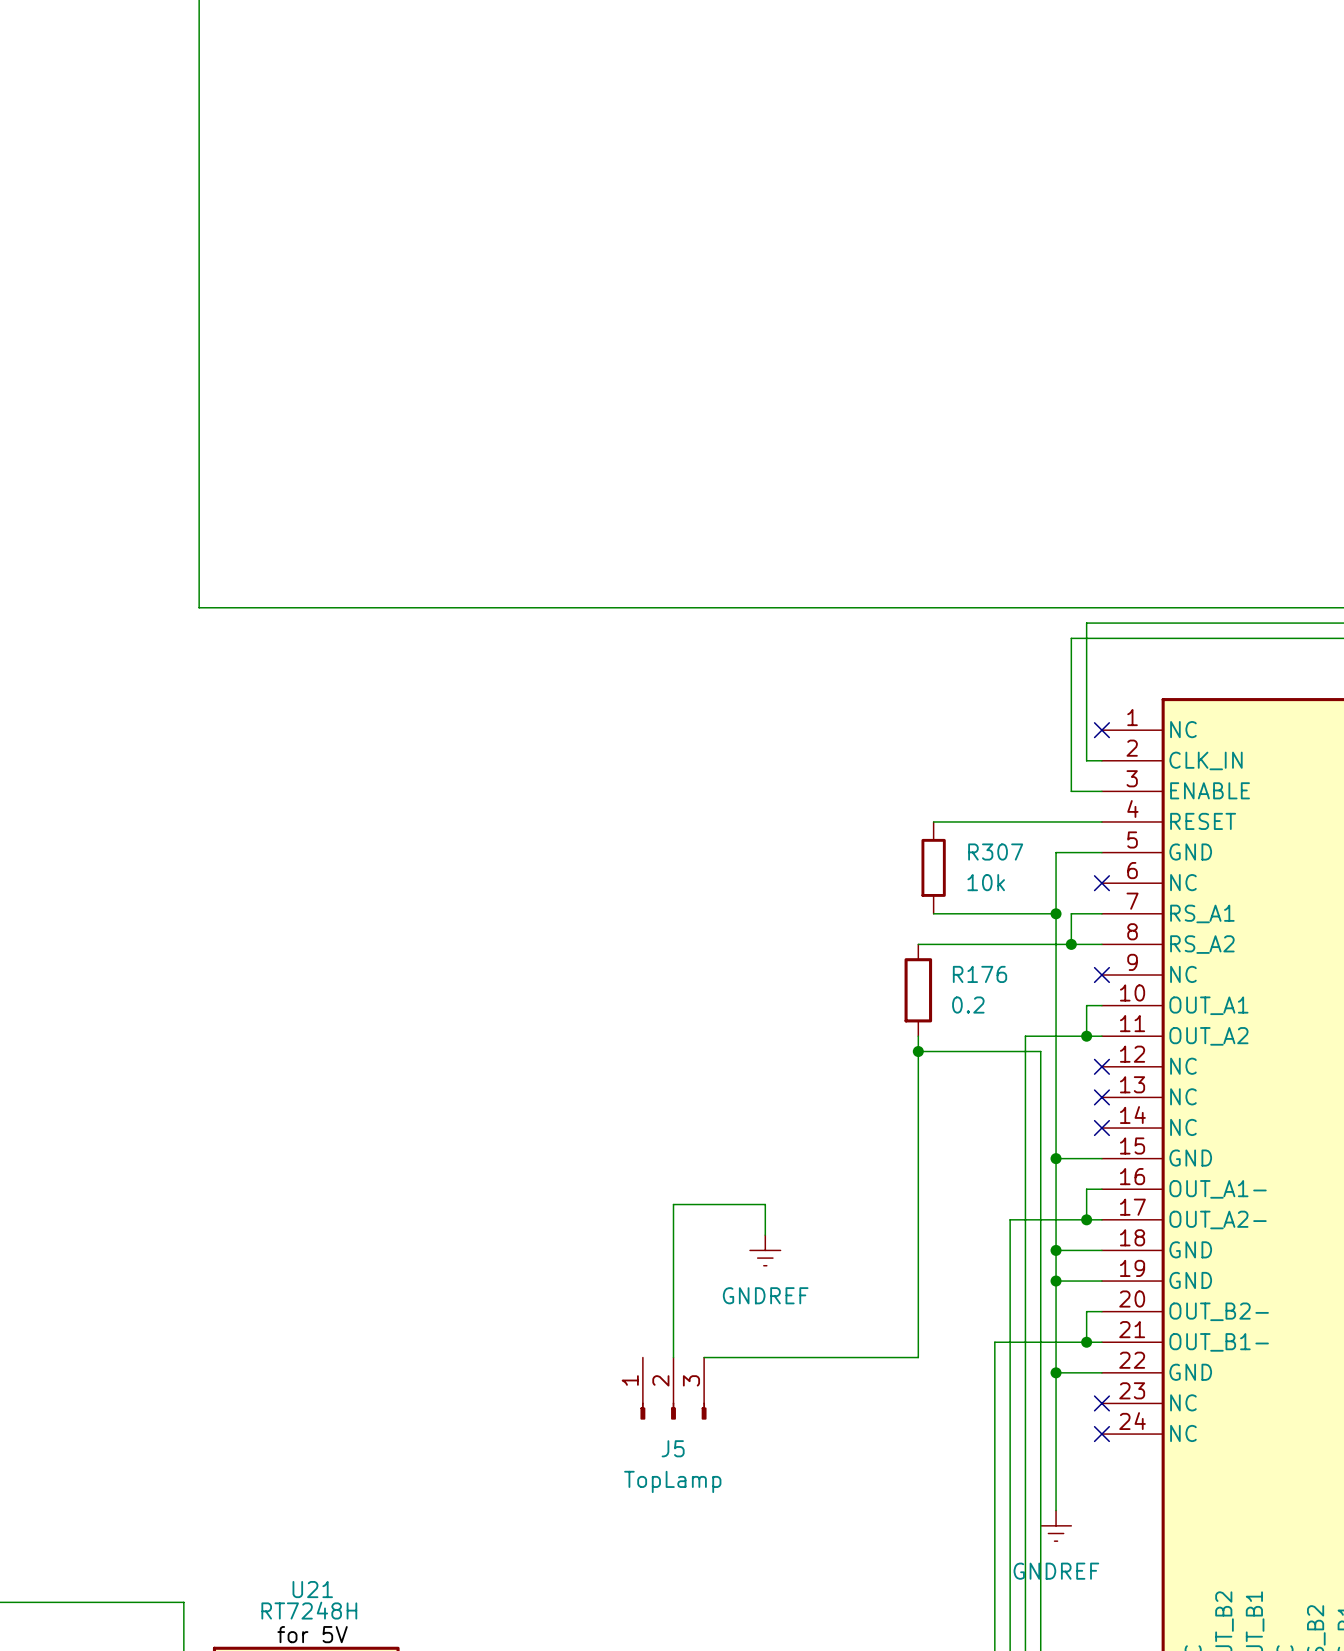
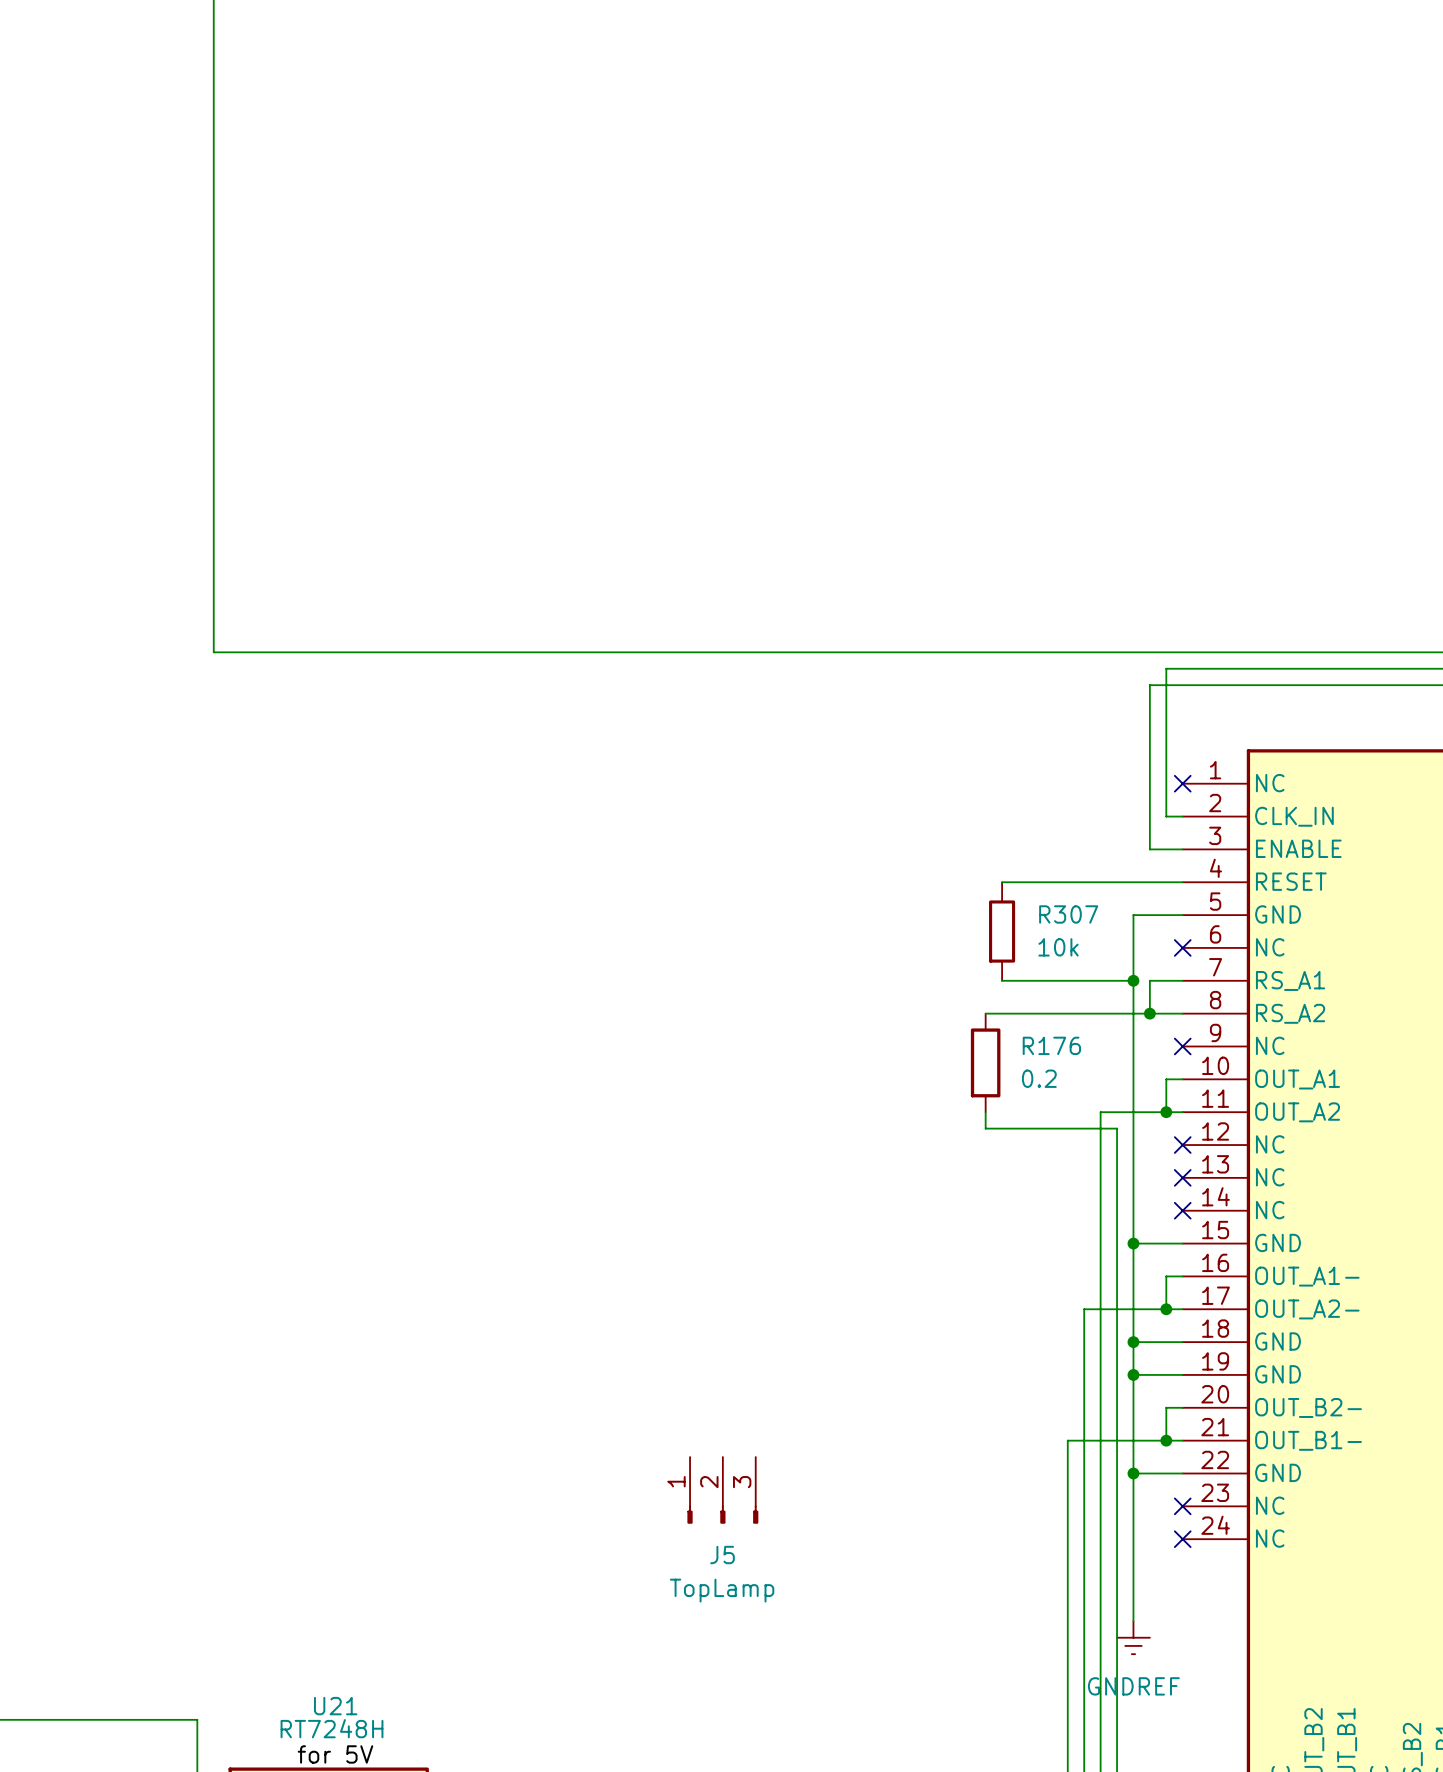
wire: (918, 1051) (918, 1357) (704, 1357) -> none
junction: (918, 1051) -> none
wire: (765, 1235) (765, 1204) (673, 1204) (673, 1357) -> none
power symbol: GNDREF (765, 1250) -> none

